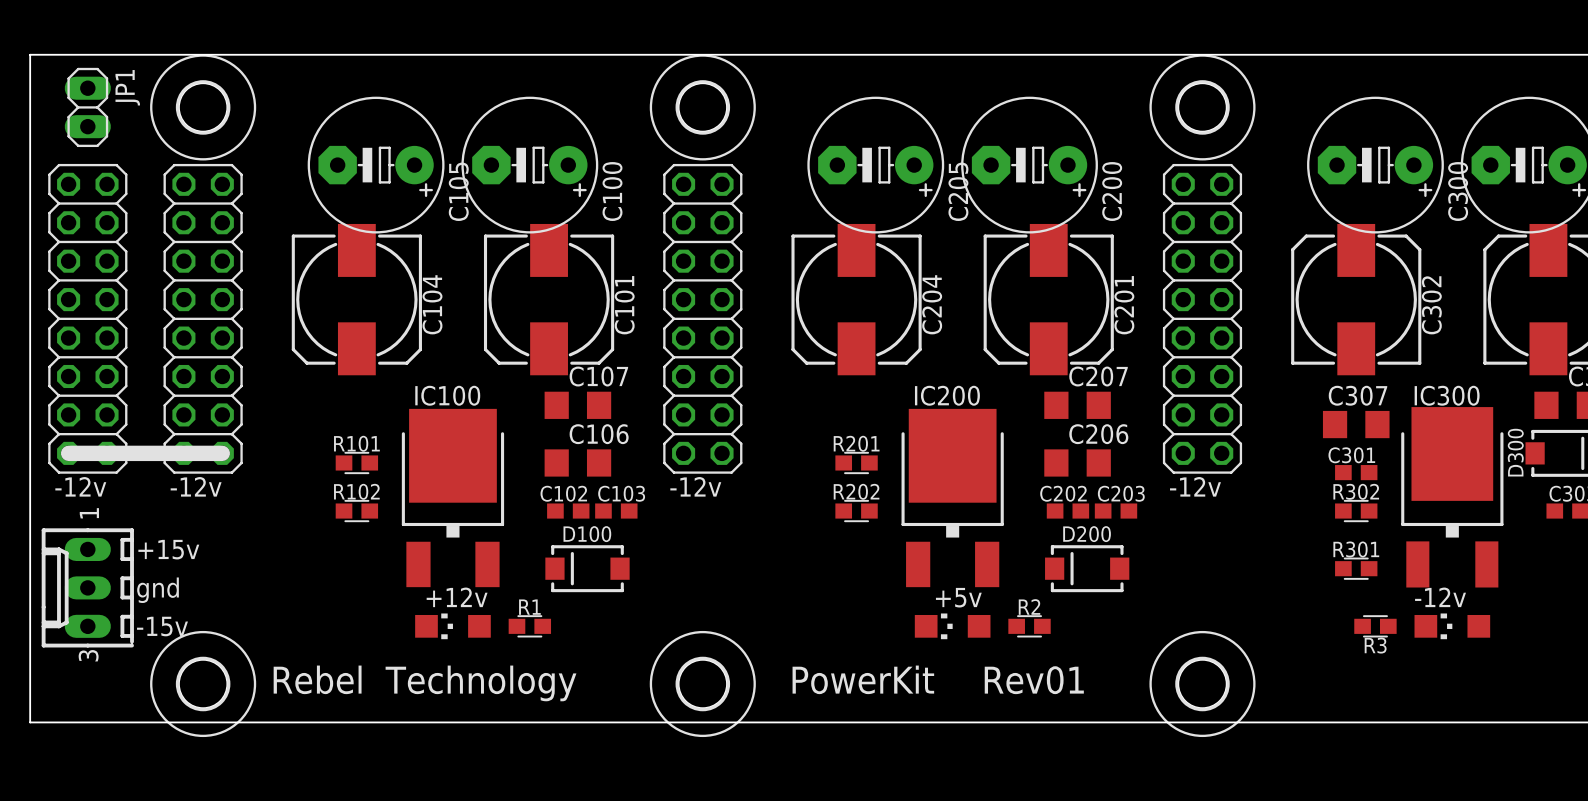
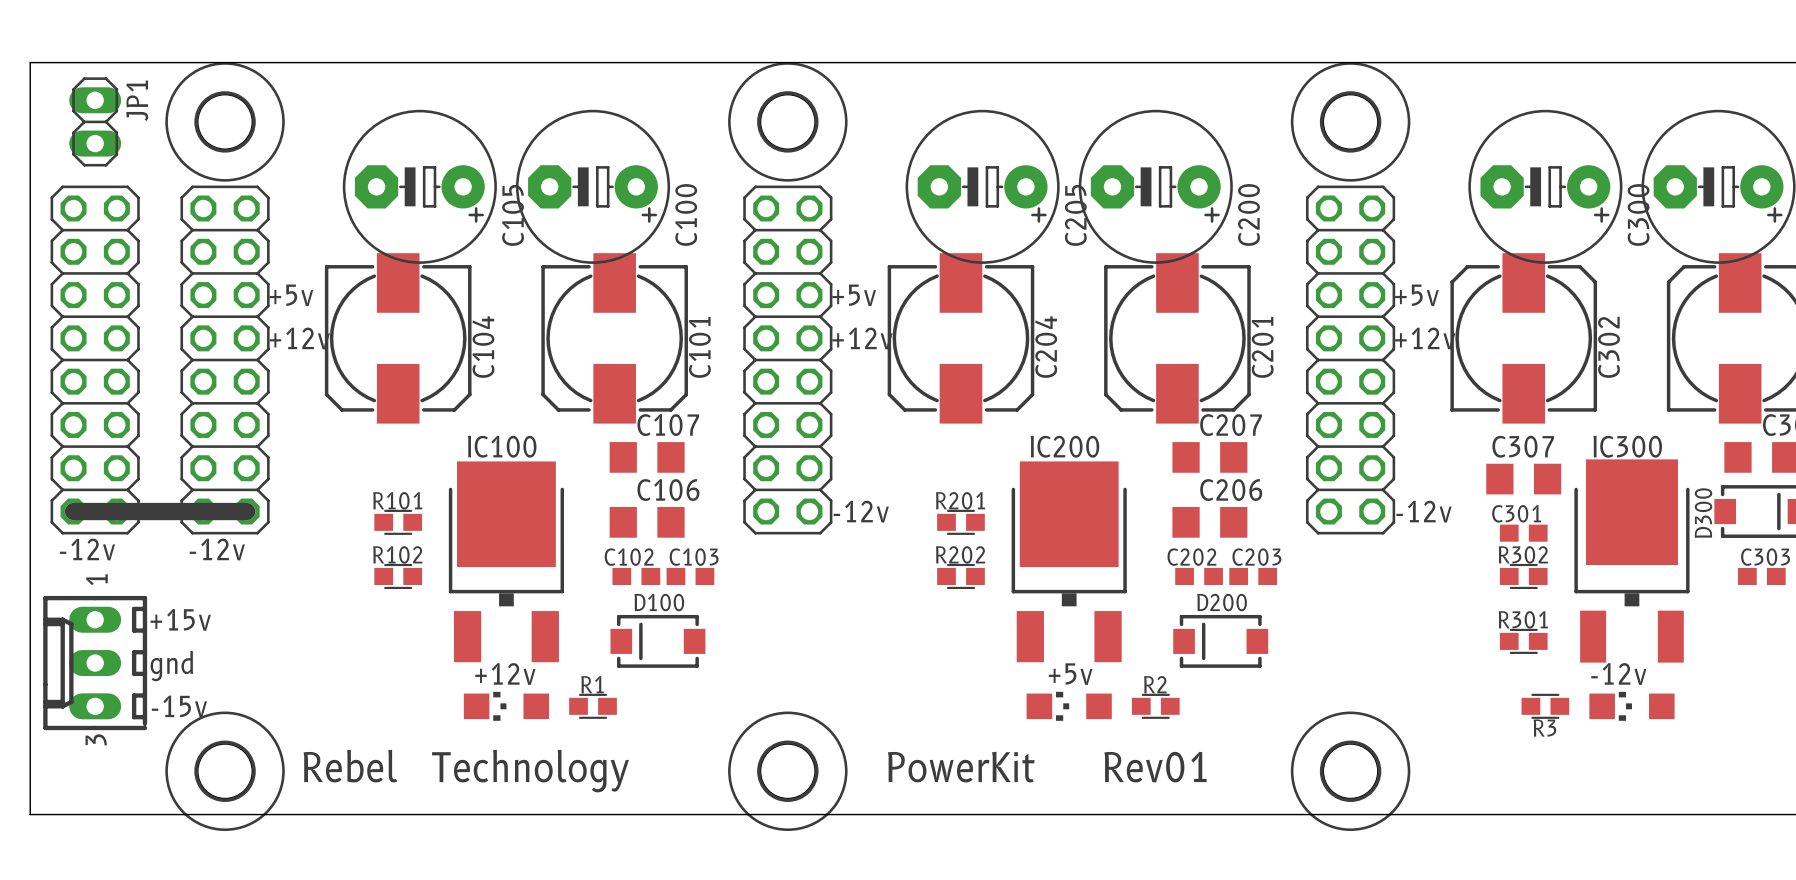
text: none -> +5v (291, 295)
text: none -> +5v (854, 295)
text: none -> +5v (1416, 295)
text: none -> +12v (299, 338)
text: none -> +12v (862, 338)
text: none -> +12v (1425, 338)
text position: -12v (695, 486) -> -12v (861, 511)
text position: -12v (1195, 486) -> -12v (1424, 511)

